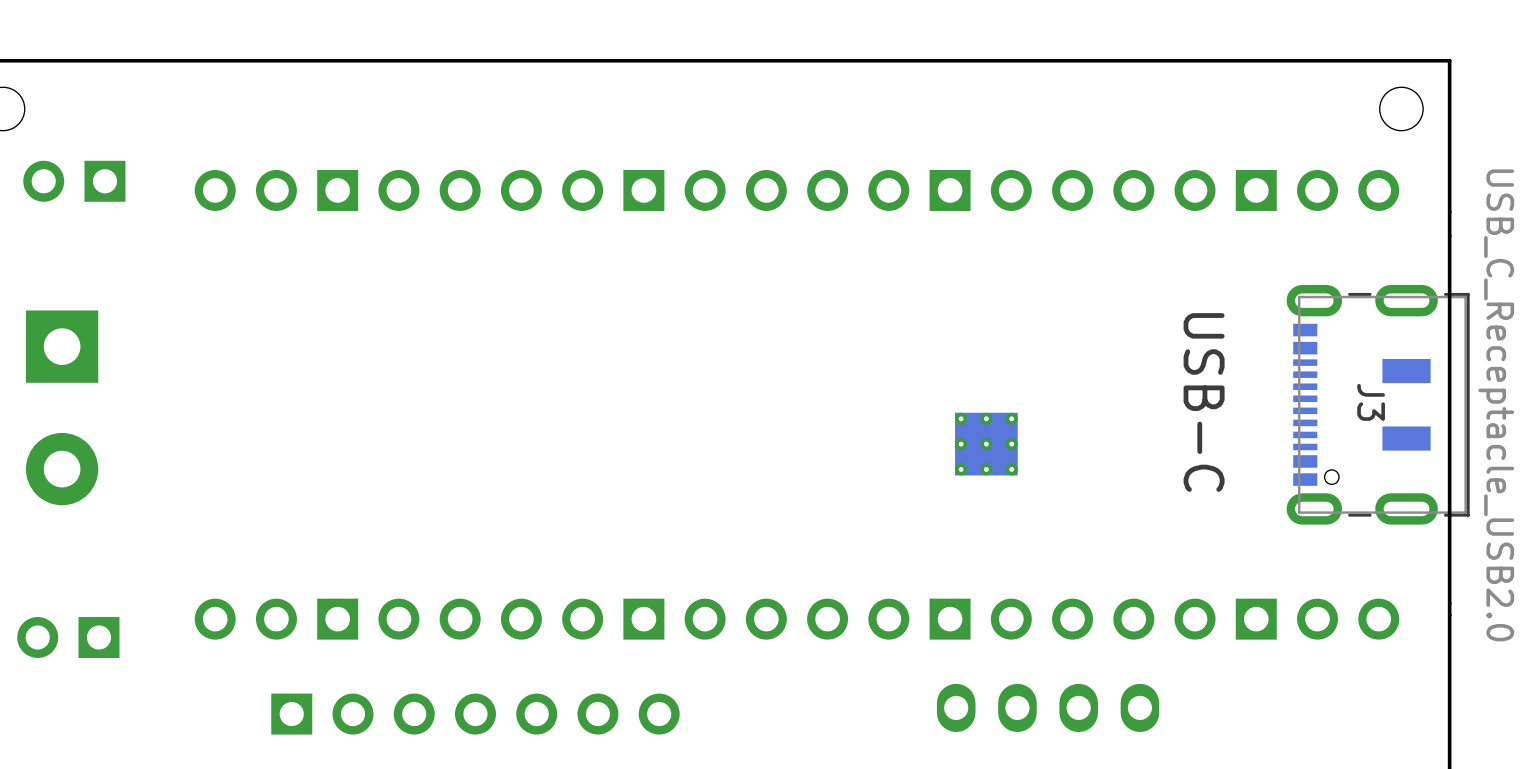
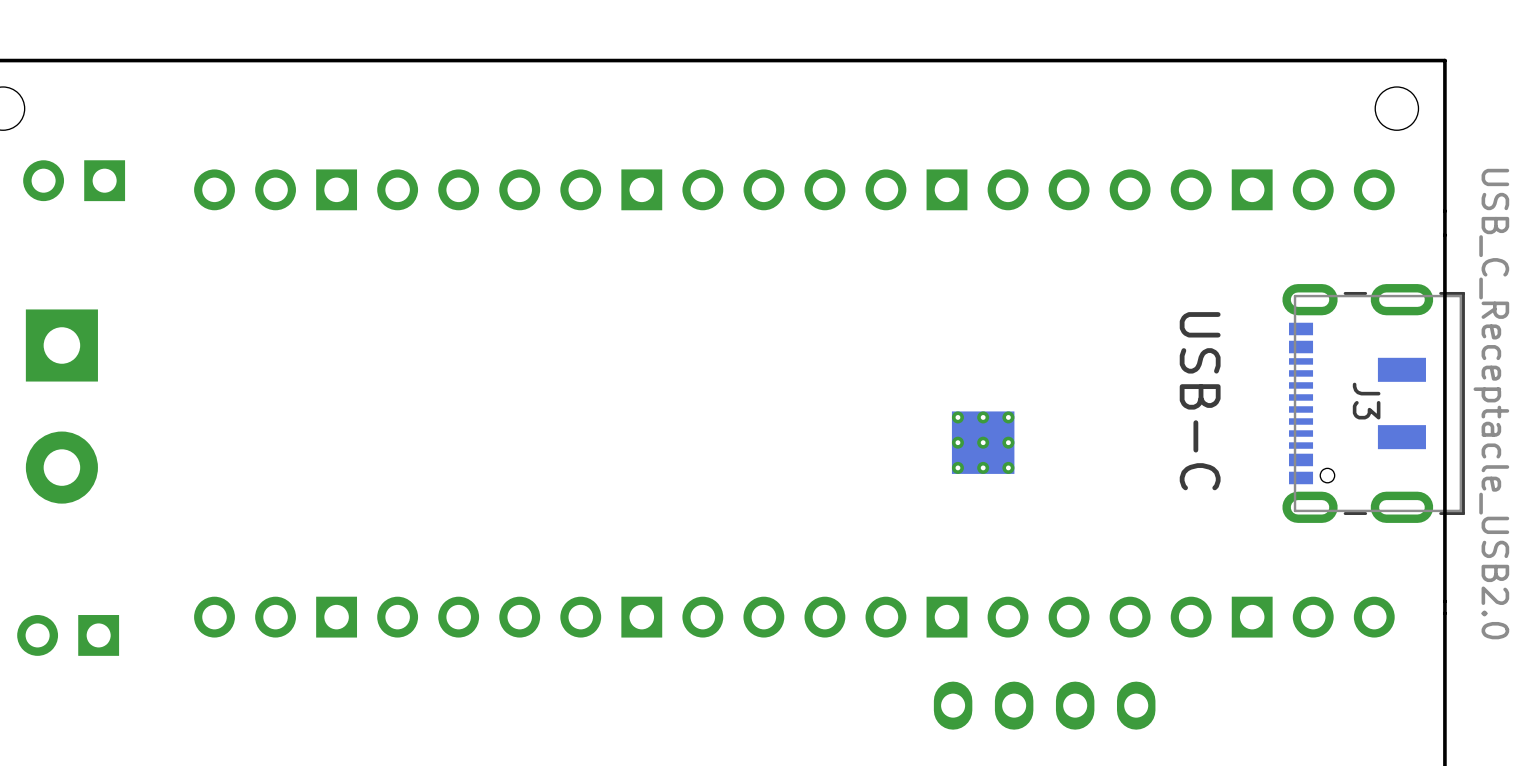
part: (475, 714) -> none

